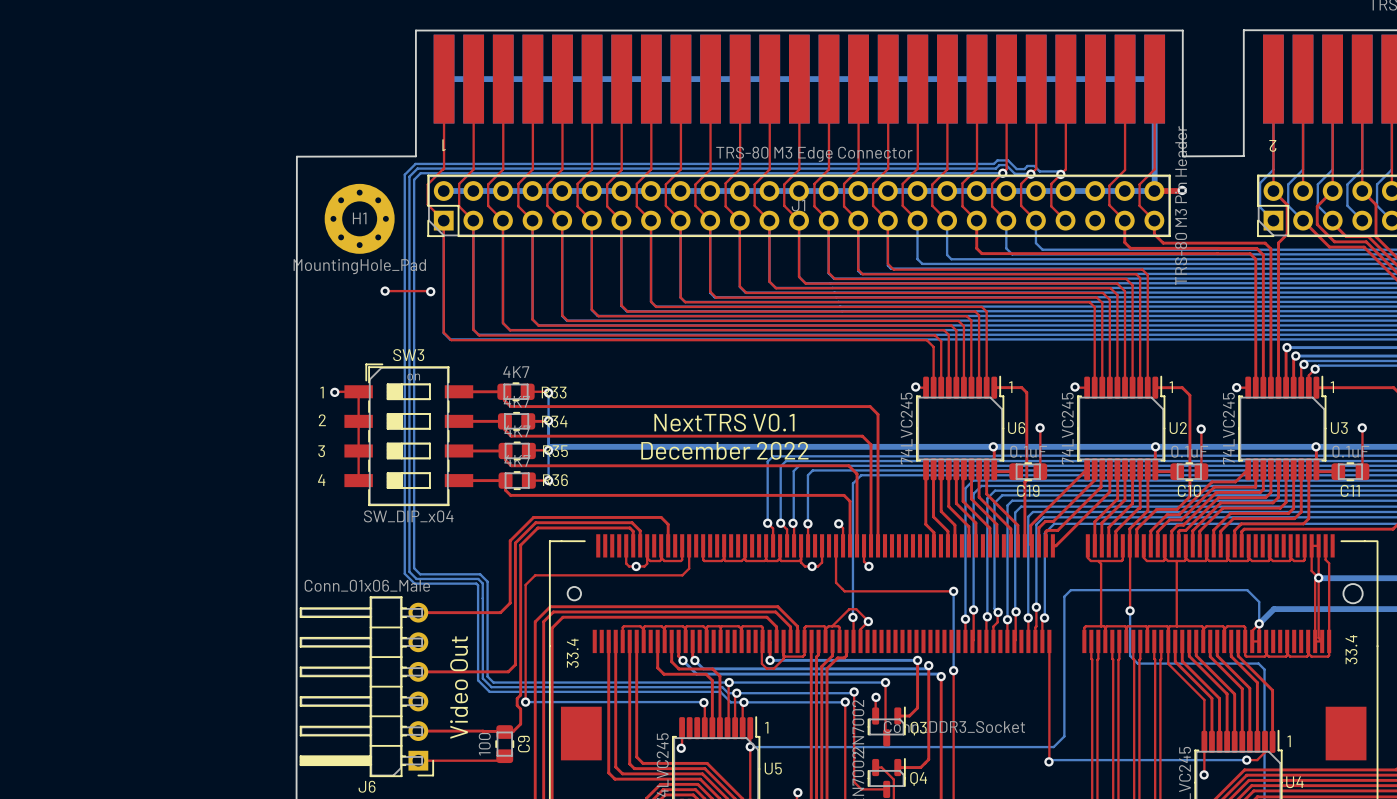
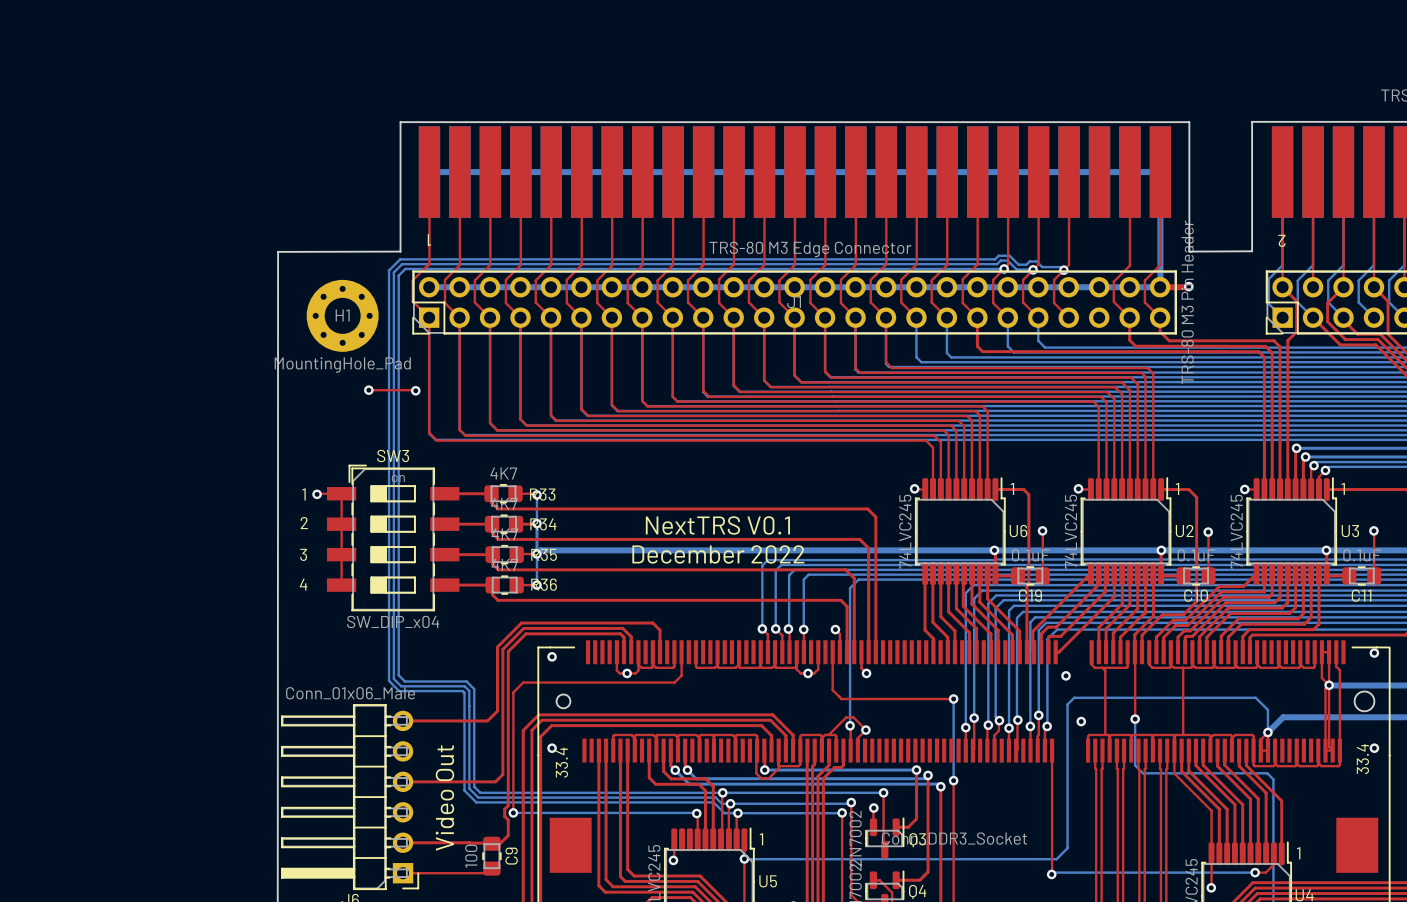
via: none -> (1374, 653)
via: none -> (552, 656)
via: none -> (1066, 675)
via: none -> (1081, 721)
via: none -> (552, 748)
via: none -> (1374, 748)

